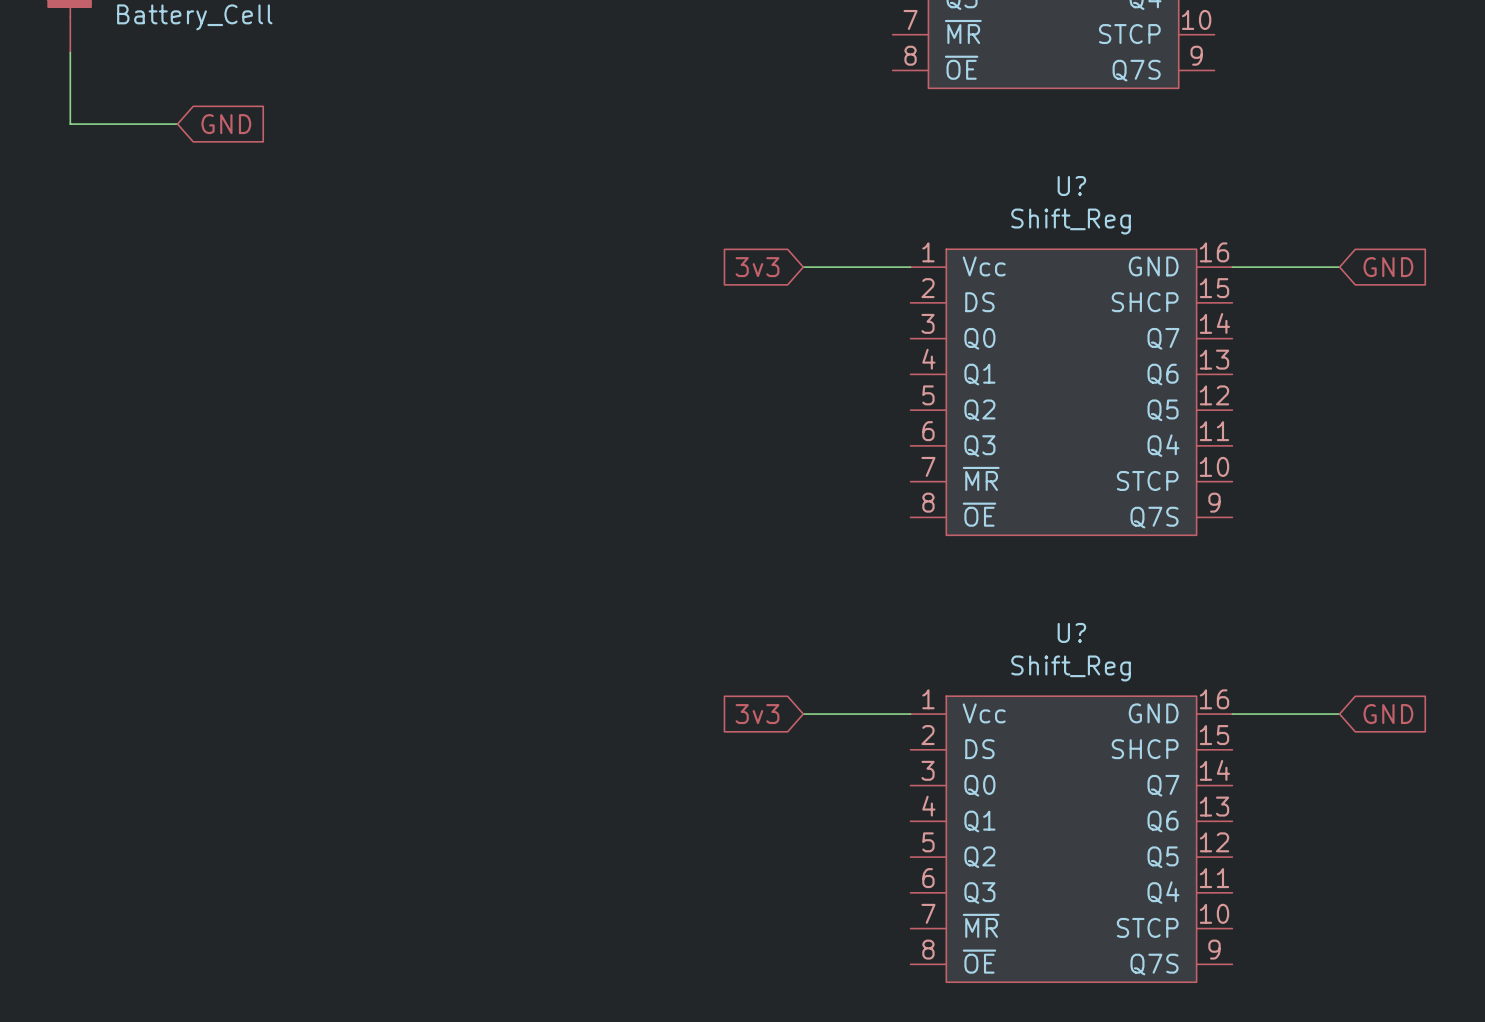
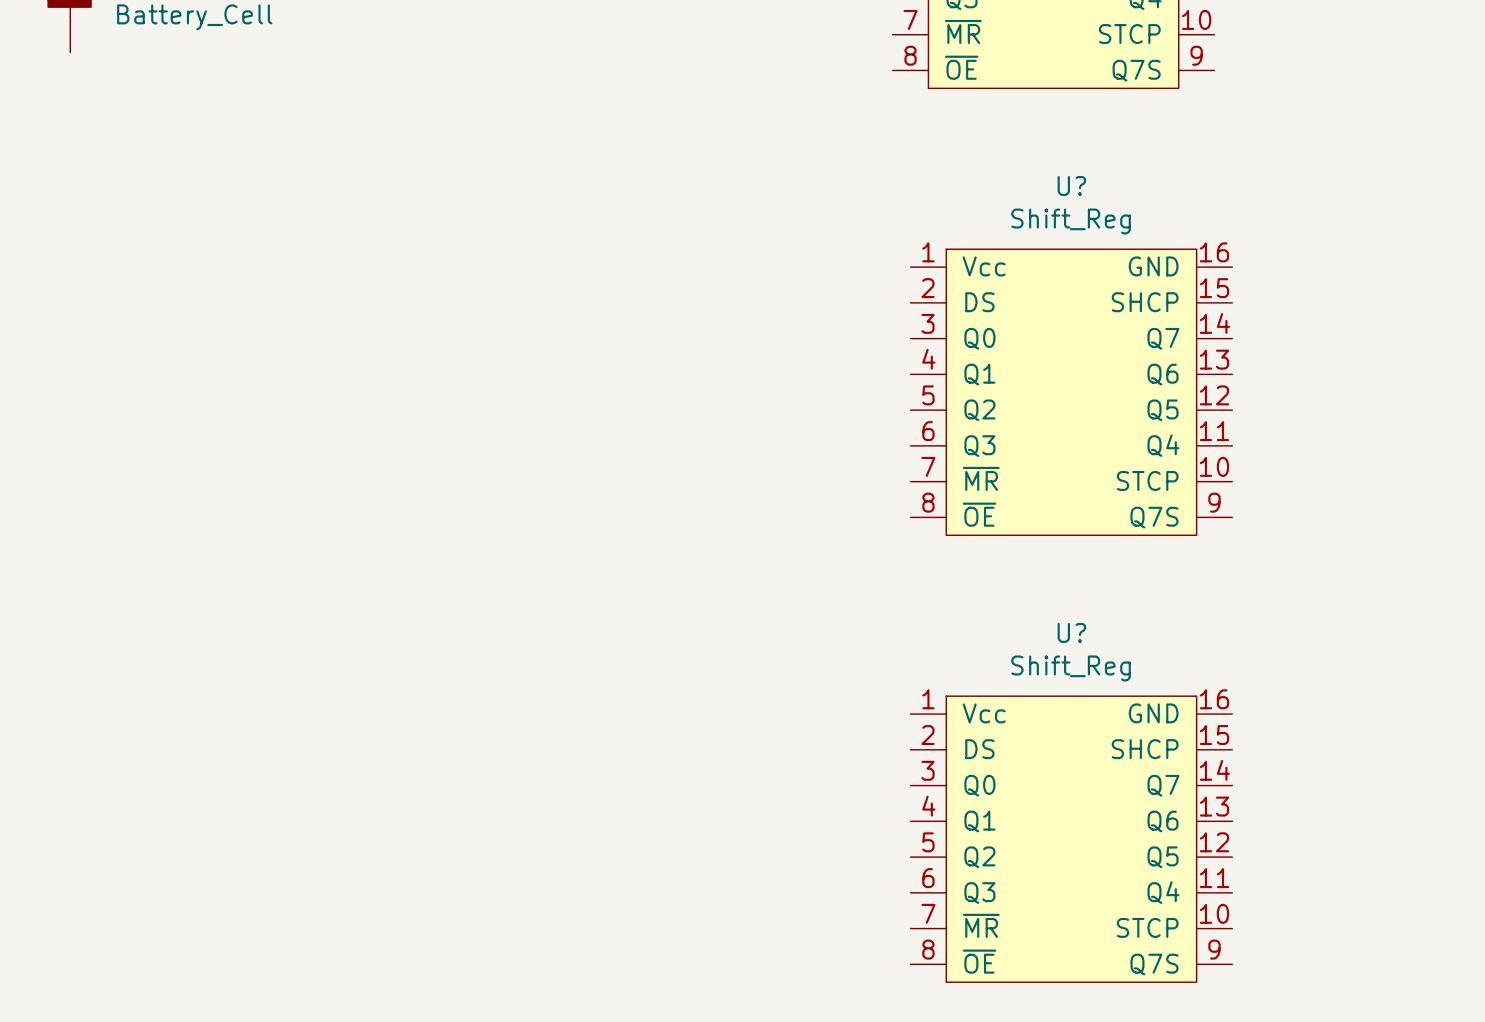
wire: (70, 52) (70, 124) (177, 124) -> none
global label: GND (226, 124) -> none
global label: 3v3 (757, 267) -> none
wire: (803, 267) (910, 267) -> none
wire: (1232, 267) (1339, 267) -> none
global label: GND (1388, 267) -> none
global label: 3v3 (757, 714) -> none
wire: (803, 714) (910, 714) -> none
wire: (1232, 714) (1339, 714) -> none
global label: GND (1388, 714) -> none

